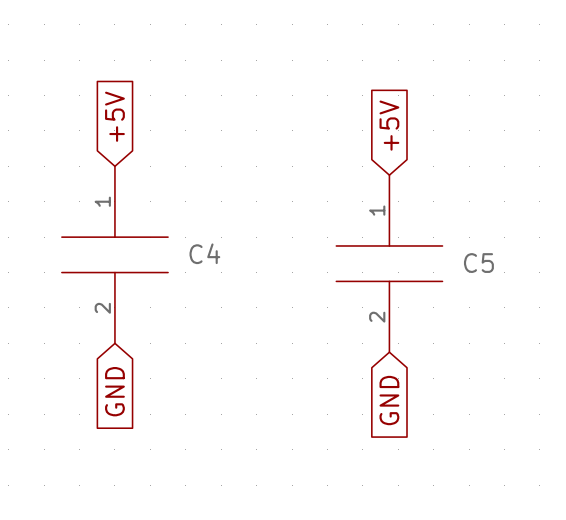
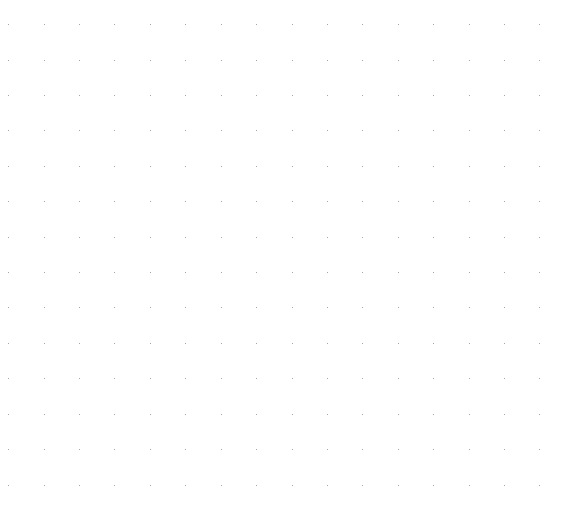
global label: +5V (114, 116) -> none
global label: +5V (389, 125) -> none
C4: (114, 254) -> none
C5: (389, 263) -> none
global label: GND (114, 391) -> none
global label: GND (389, 400) -> none

